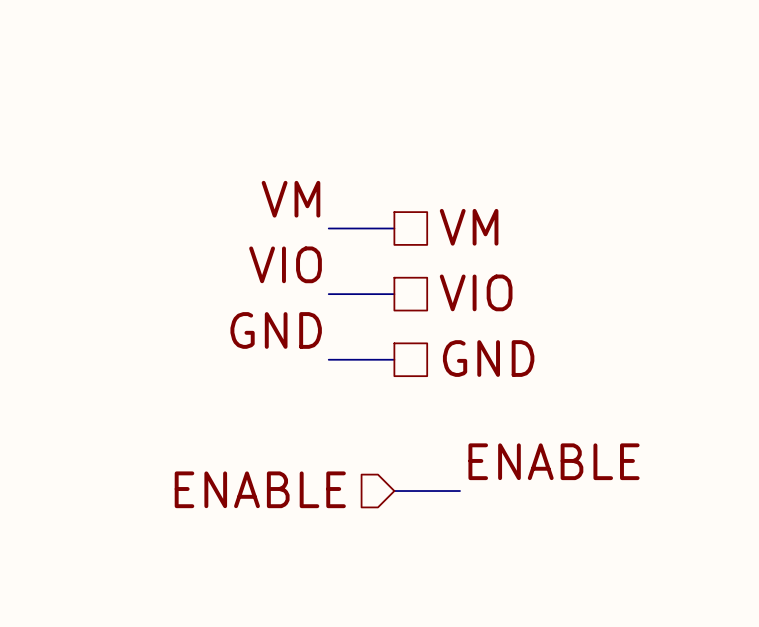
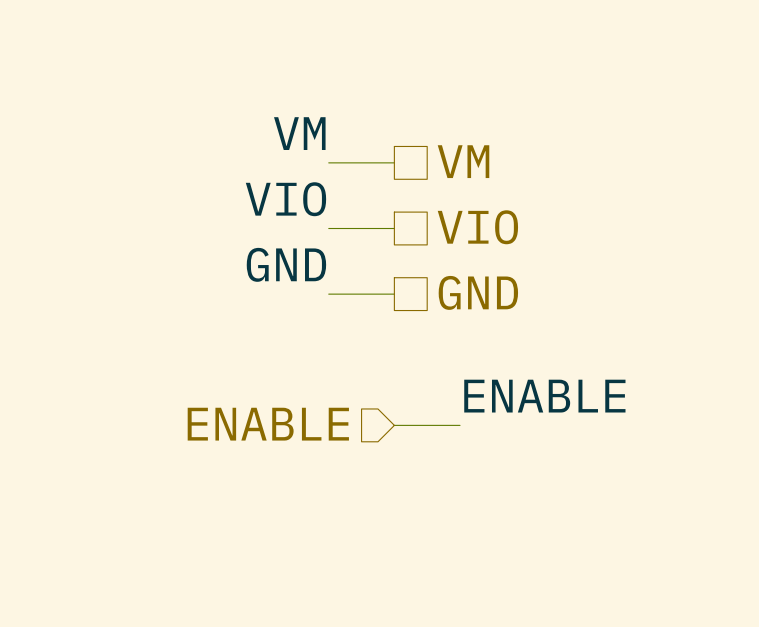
label: none -> VM (299, 133)
hierarchical label: none -> VM (463, 161)
label: VM (291, 199) -> VIO (285, 199)
hierarchical label: VM (469, 227) -> VIO (477, 227)
label: VIO (285, 264) -> GND (286, 264)
hierarchical label: VIO (476, 292) -> GND (478, 292)
label: GND (276, 330) -> none
hierarchical label: GND (488, 358) -> none
wire: (328, 359) (394, 359) -> (328, 162) (394, 162)
label position: ENABLE (554, 461) -> ENABLE (544, 396)
hierarchical label position: ENABLE (260, 489) -> ENABLE (268, 424)
wire: (394, 491) (460, 491) -> (394, 425) (460, 425)

